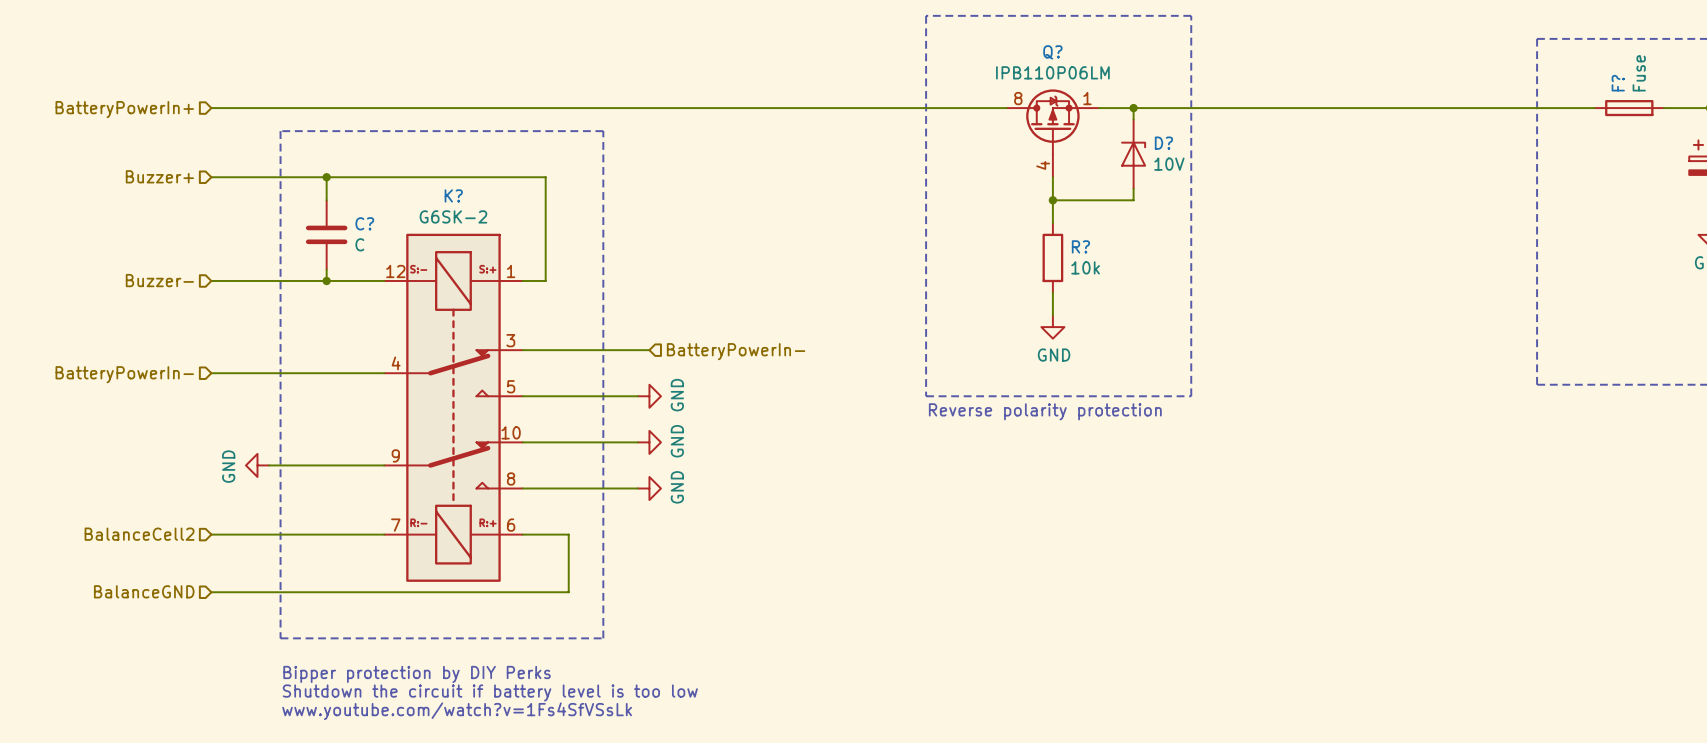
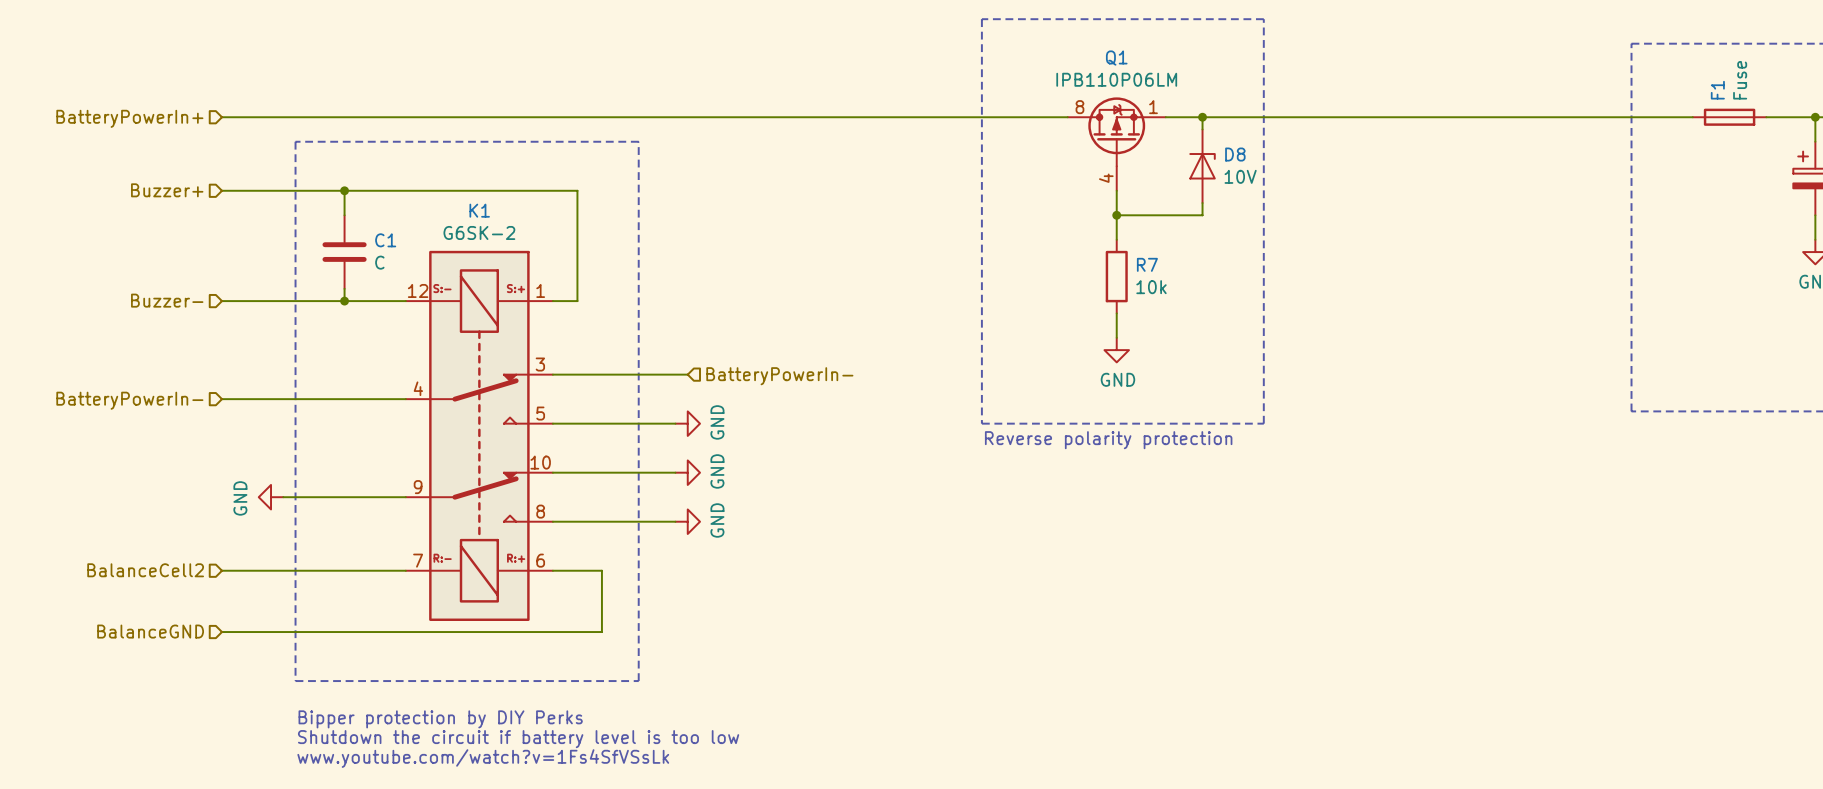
Q? name: Q? (1052, 52) -> Q1 (1116, 58)
F? name: F? (1618, 83) -> F1 (1717, 90)
D? name: D? (1163, 143) -> D8 (1235, 154)
K? name: K? (453, 195) -> K1 (479, 210)
C? name: C? (364, 223) -> C1 (385, 240)
R? name: R? (1080, 246) -> R7 (1147, 264)

